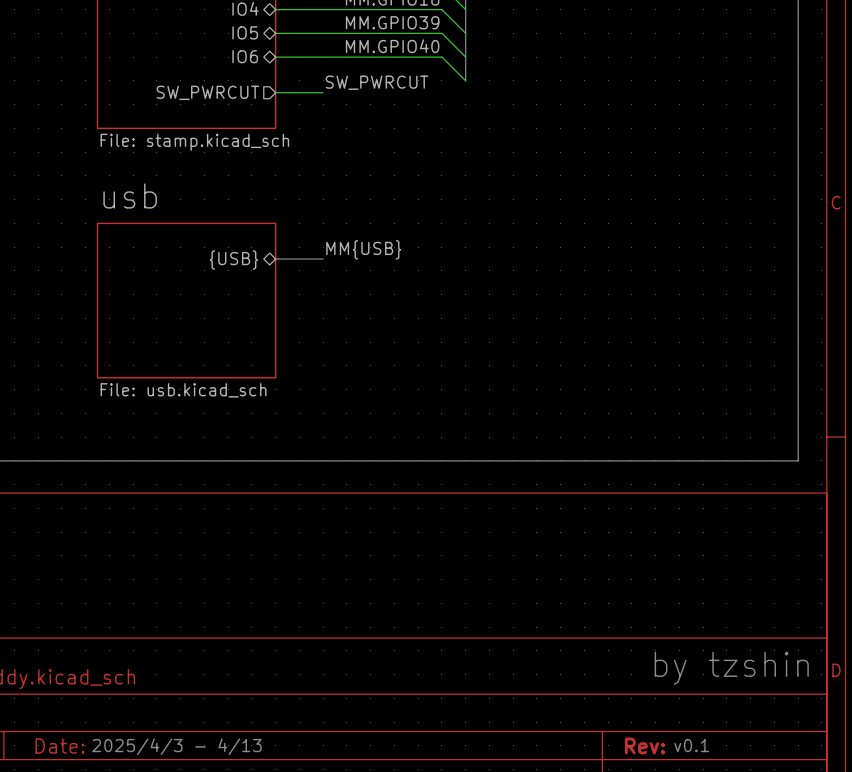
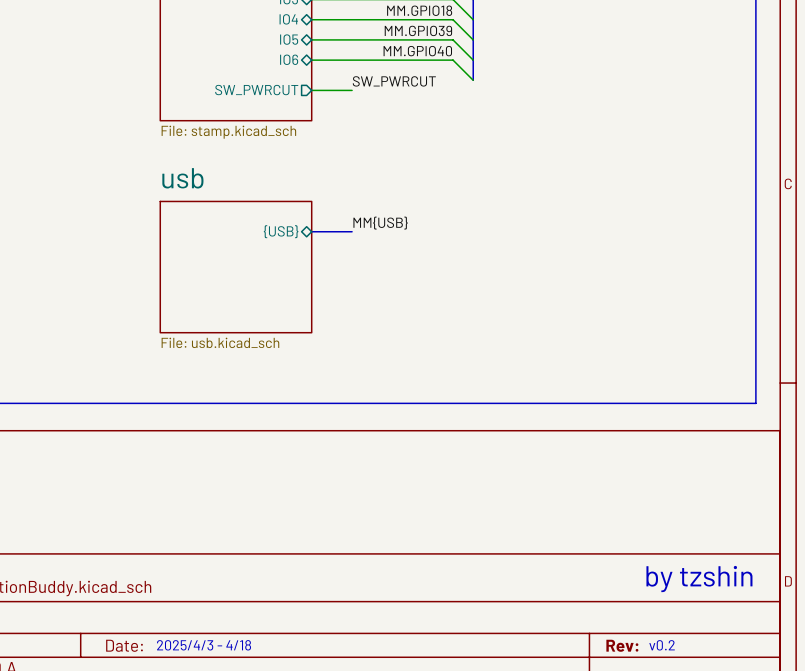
text: v0.1 (691, 745) -> v0.2 (662, 645)
text: 2025/4/3 - 4/13 (177, 746) -> 2025/4/3 - 4/18 (204, 645)

